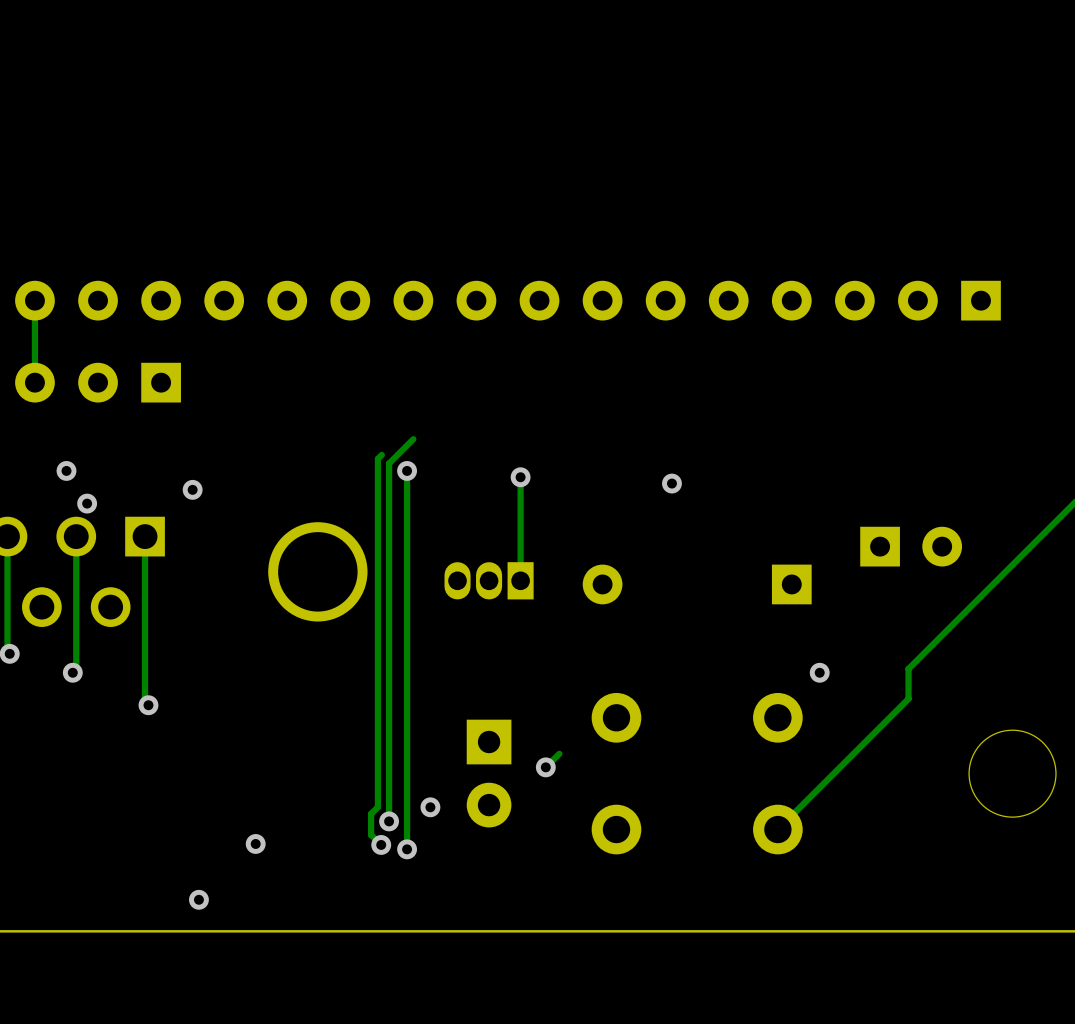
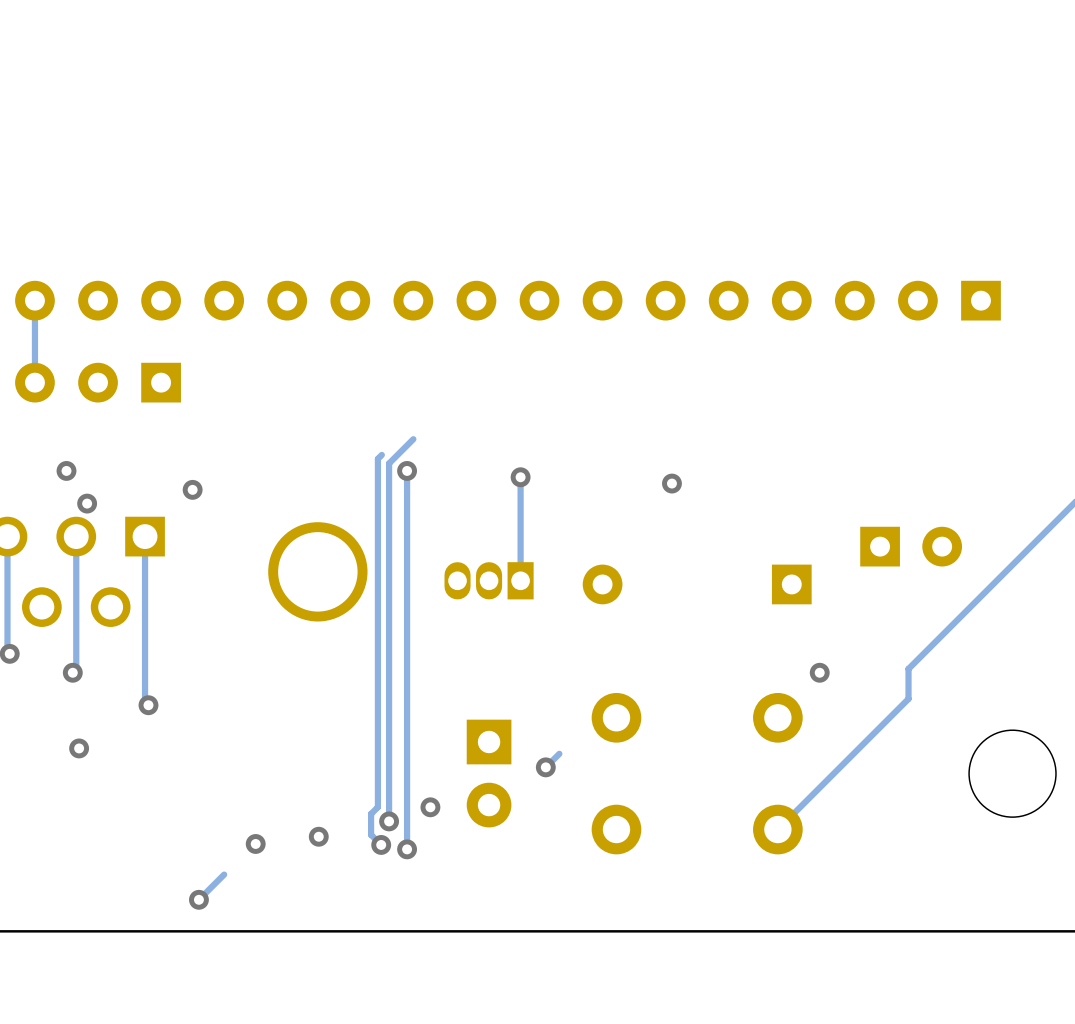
via: none -> (79, 748)
via: none -> (318, 836)
track: none -> (224, 874) (198, 899)

